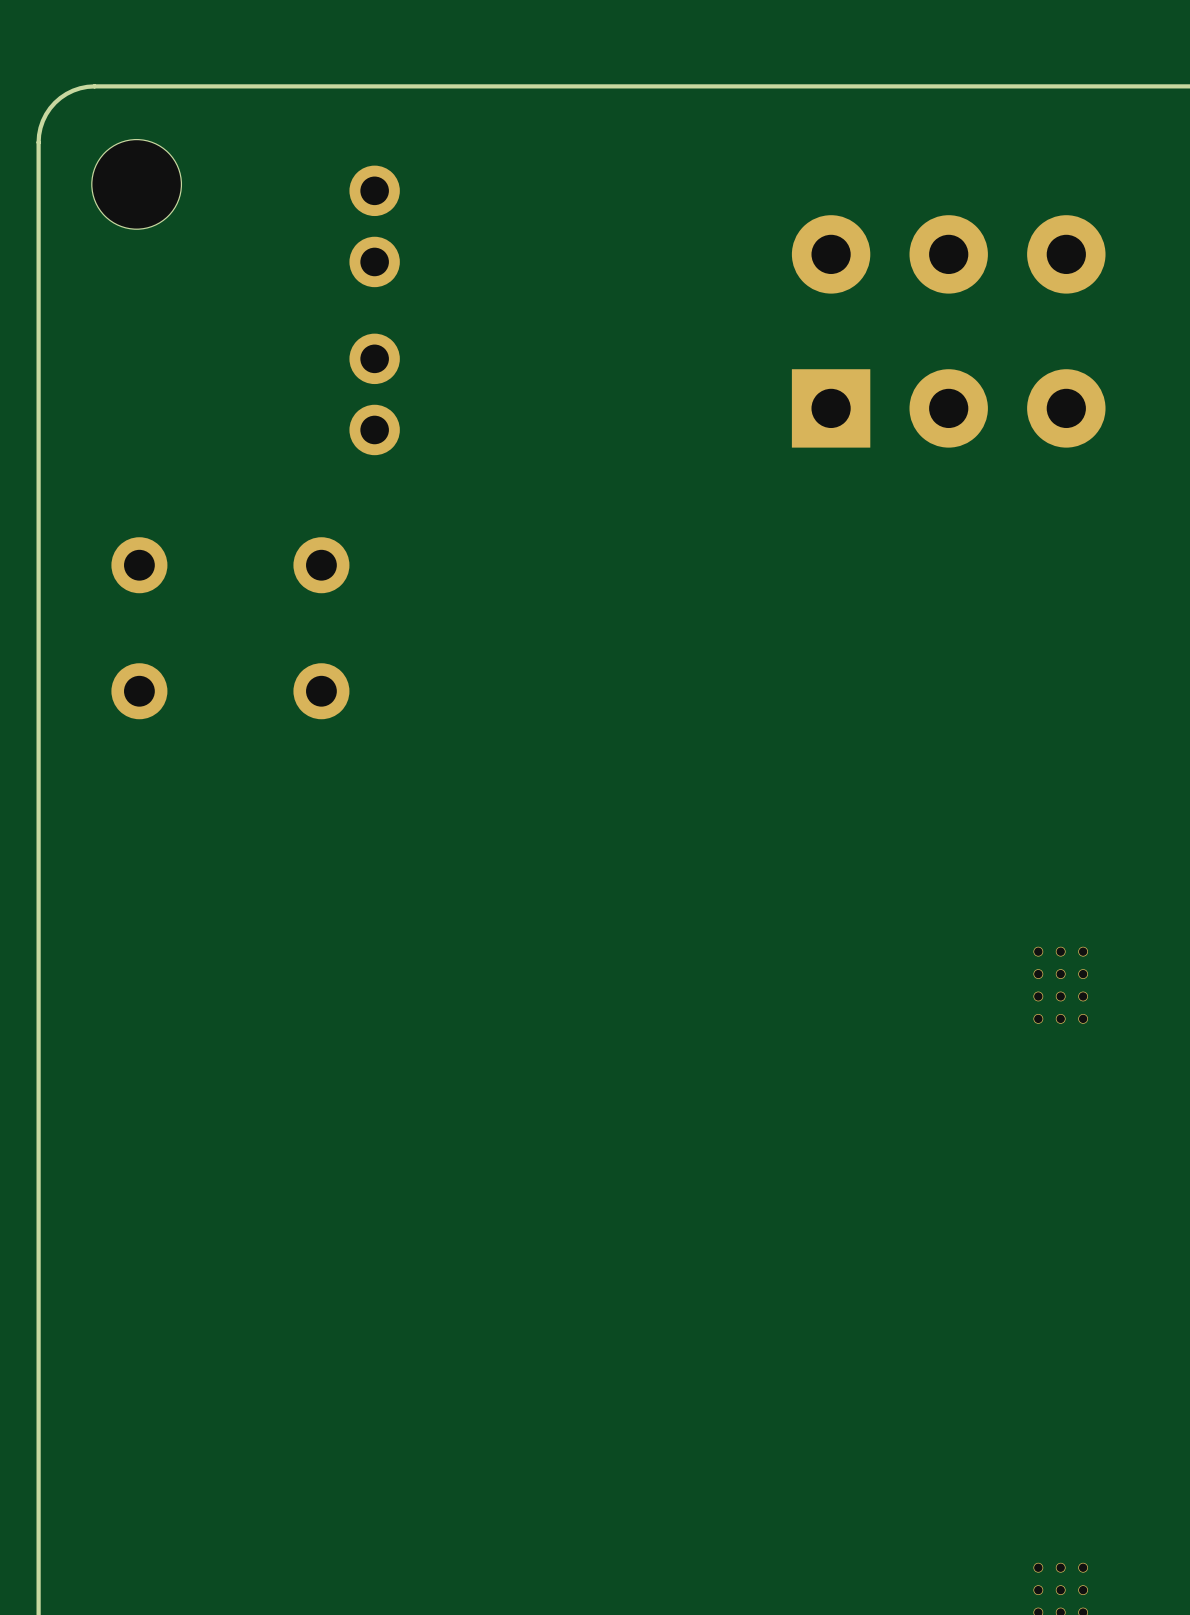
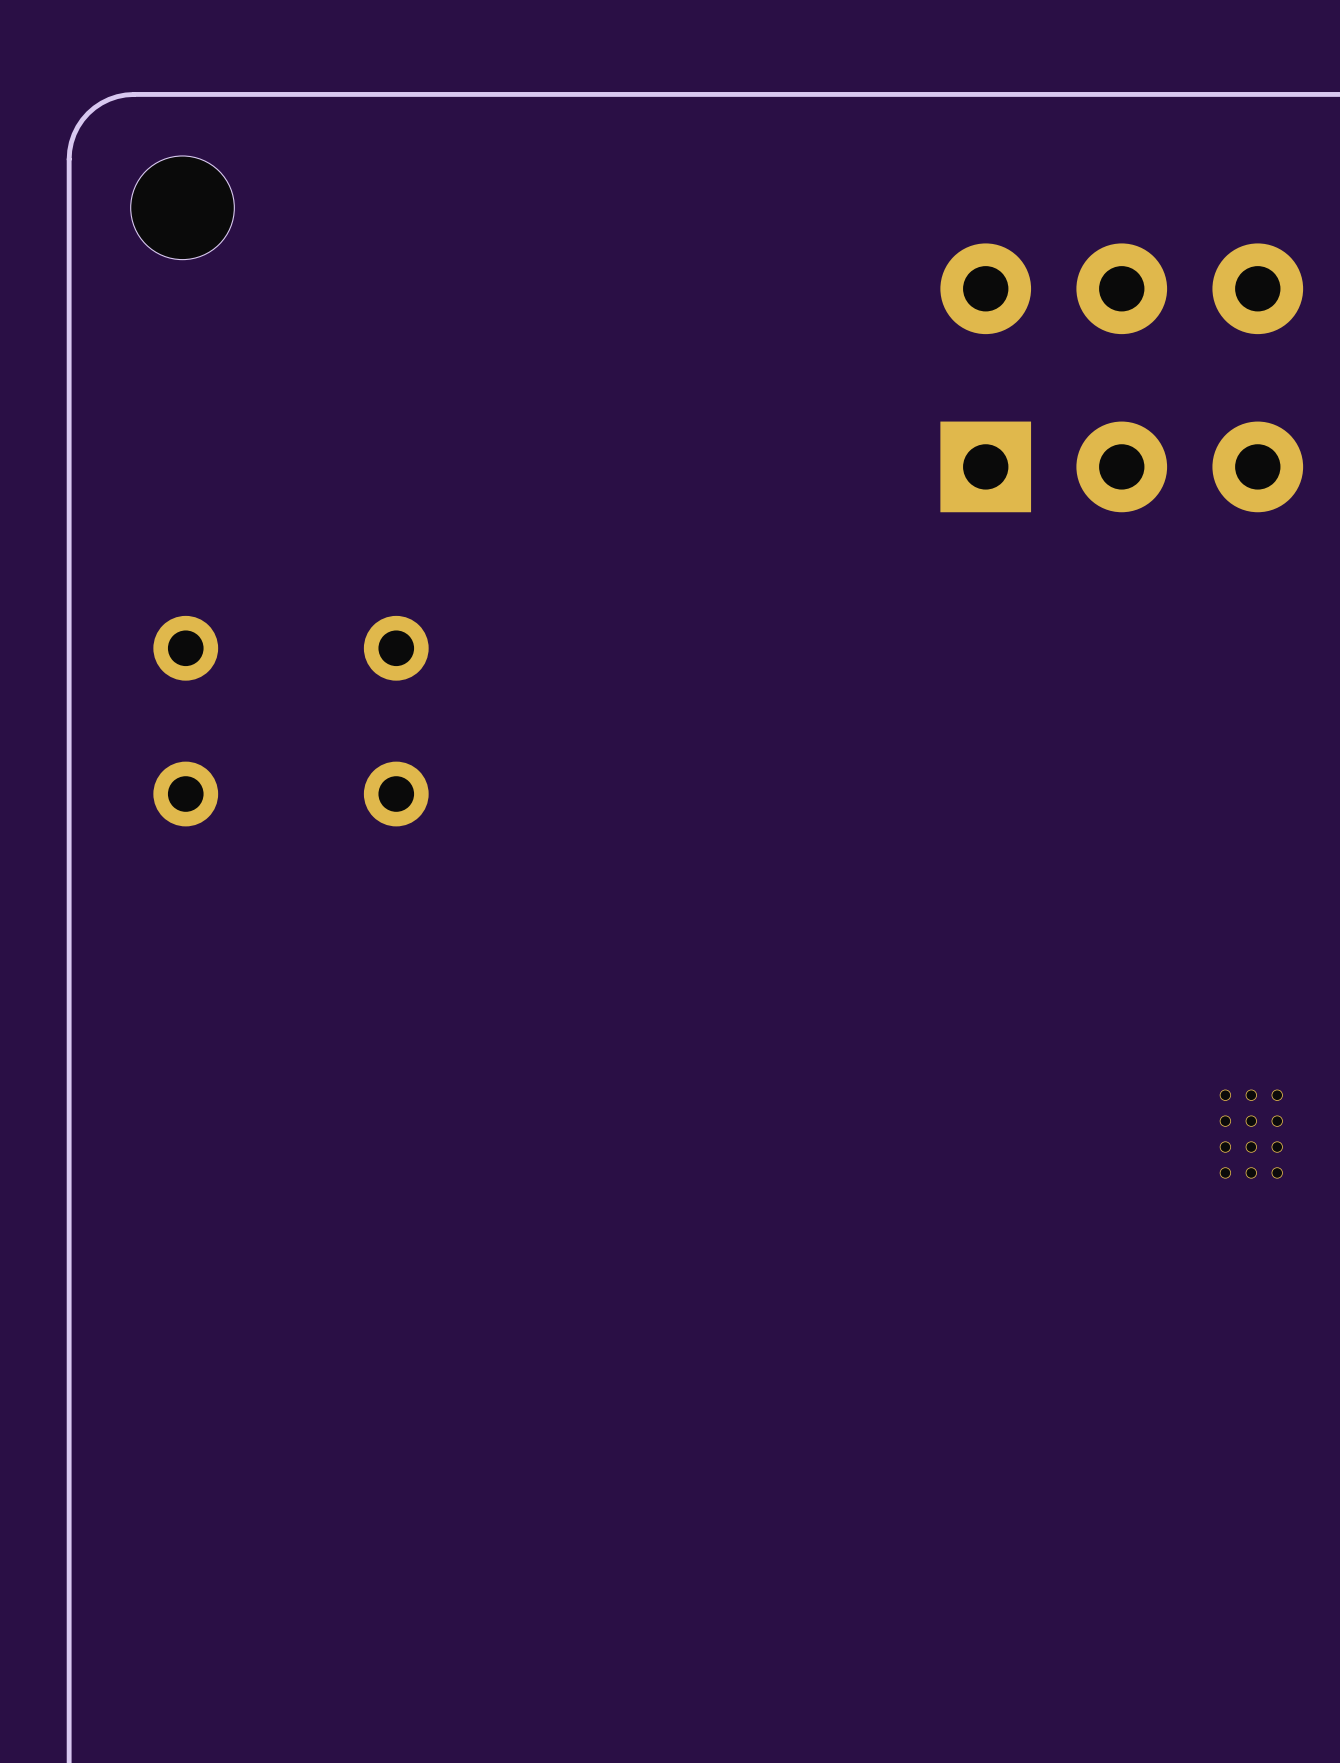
part: (374, 226) -> none
part: (374, 394) -> none

